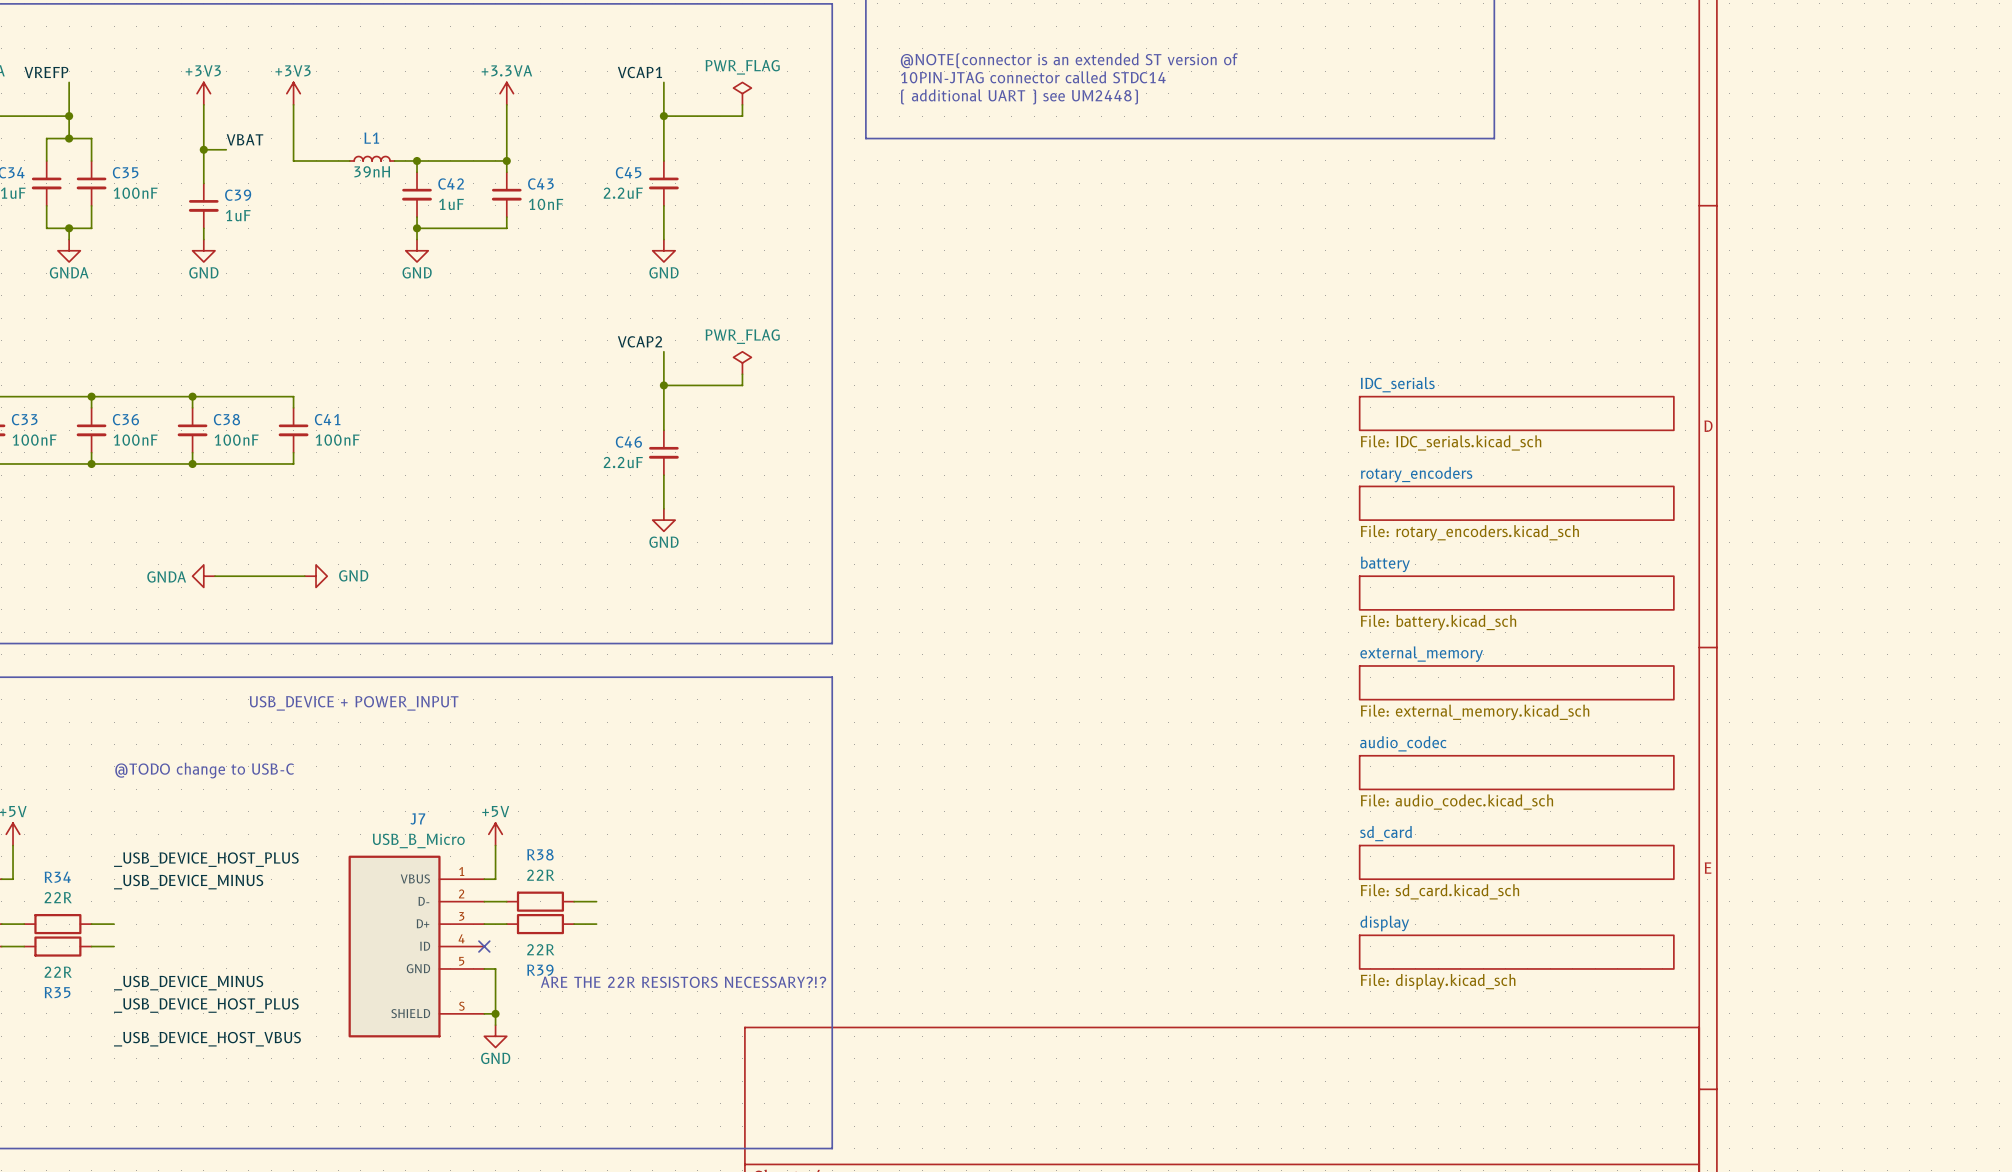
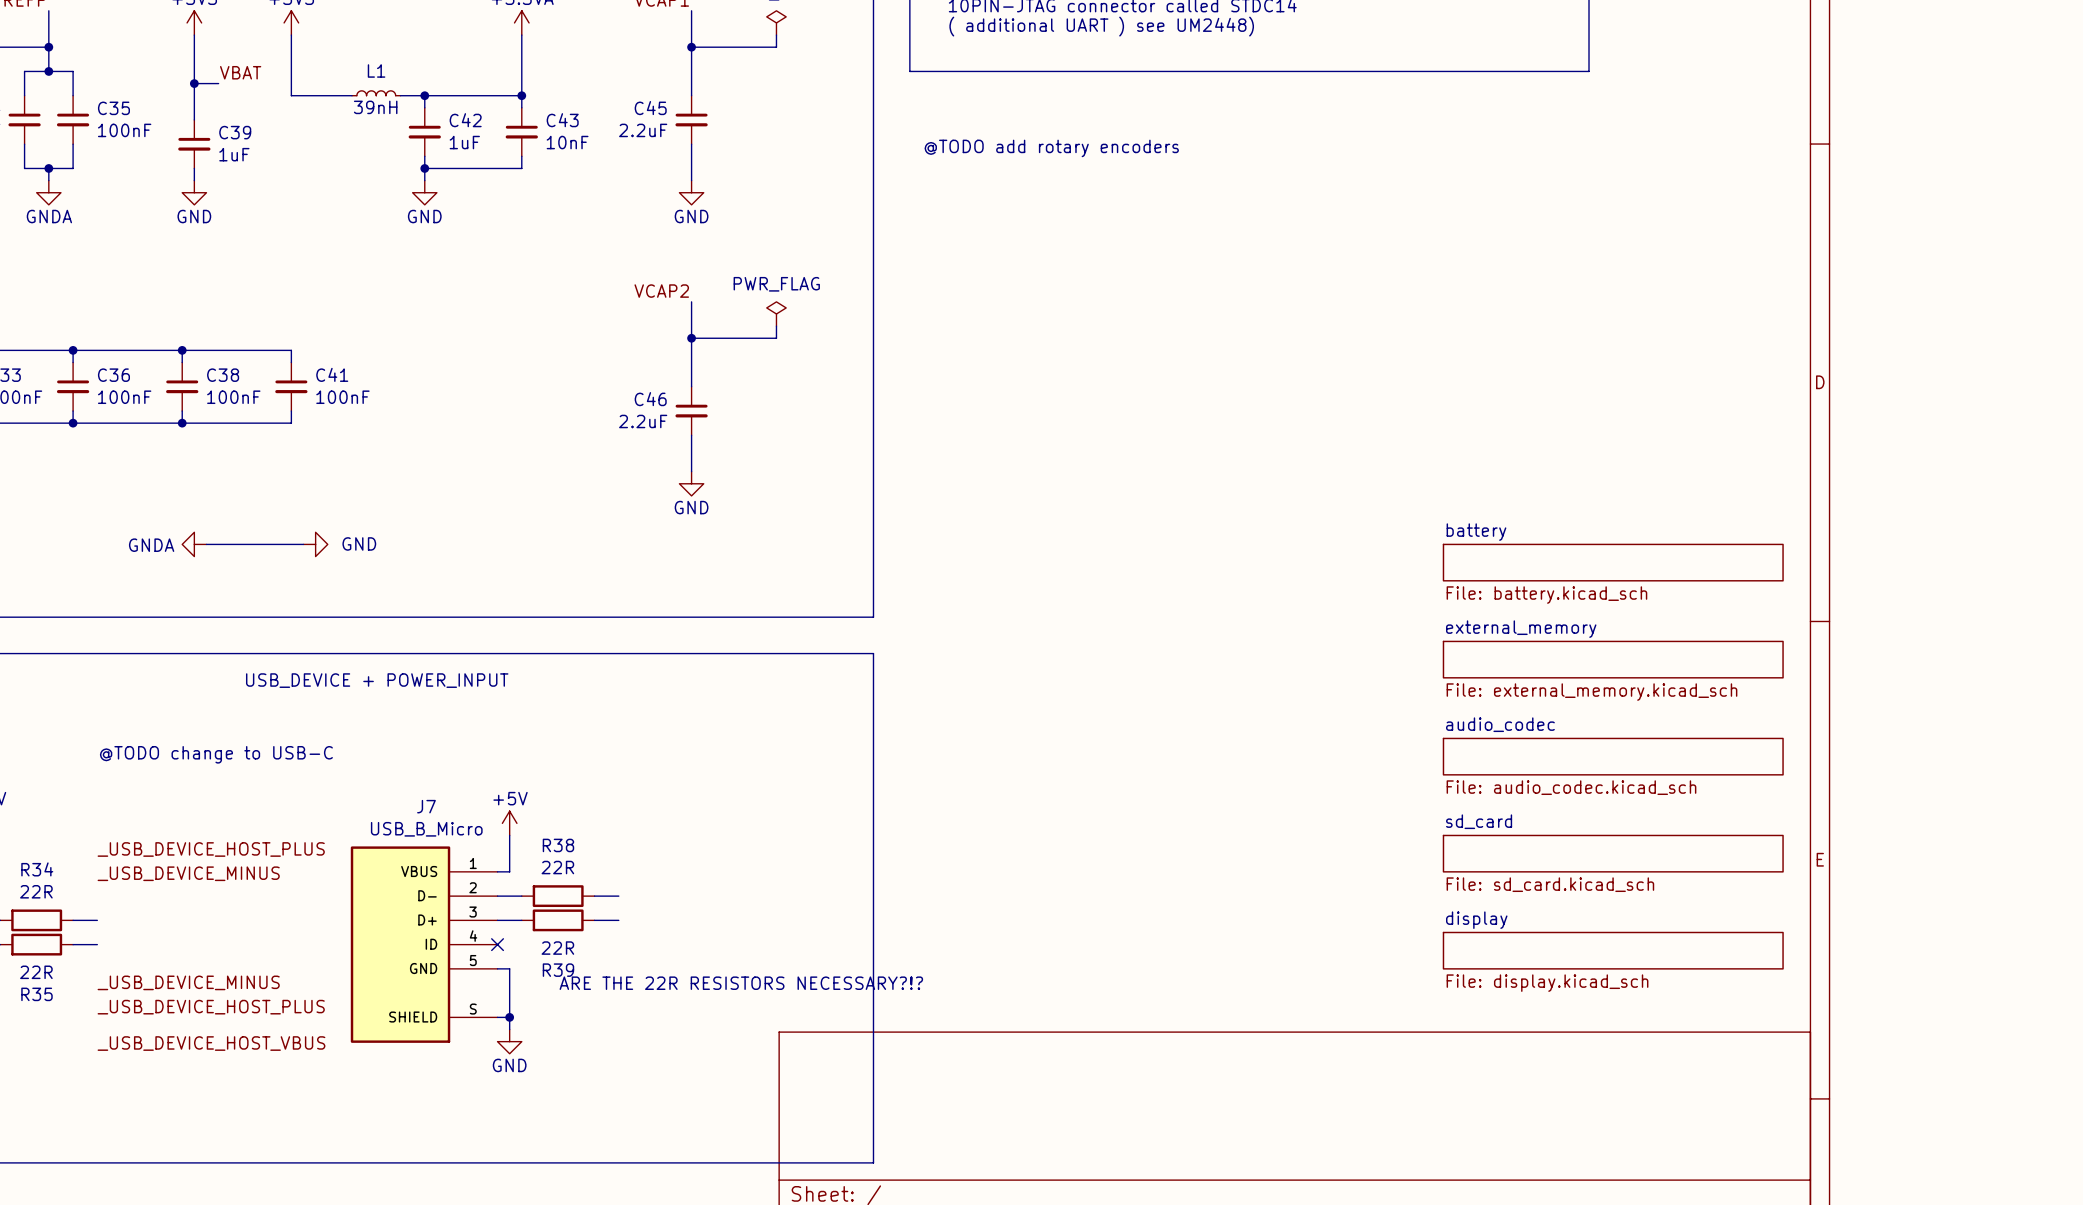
text: none -> @TODO add rotary encoders (1051, 148)
sheet IDC_serials: File: IDC_serials.kicad_sch (1516, 413) -> none
sheet rotary_encoders: File: rotary_encoders.kicad_sch (1516, 503) -> none

